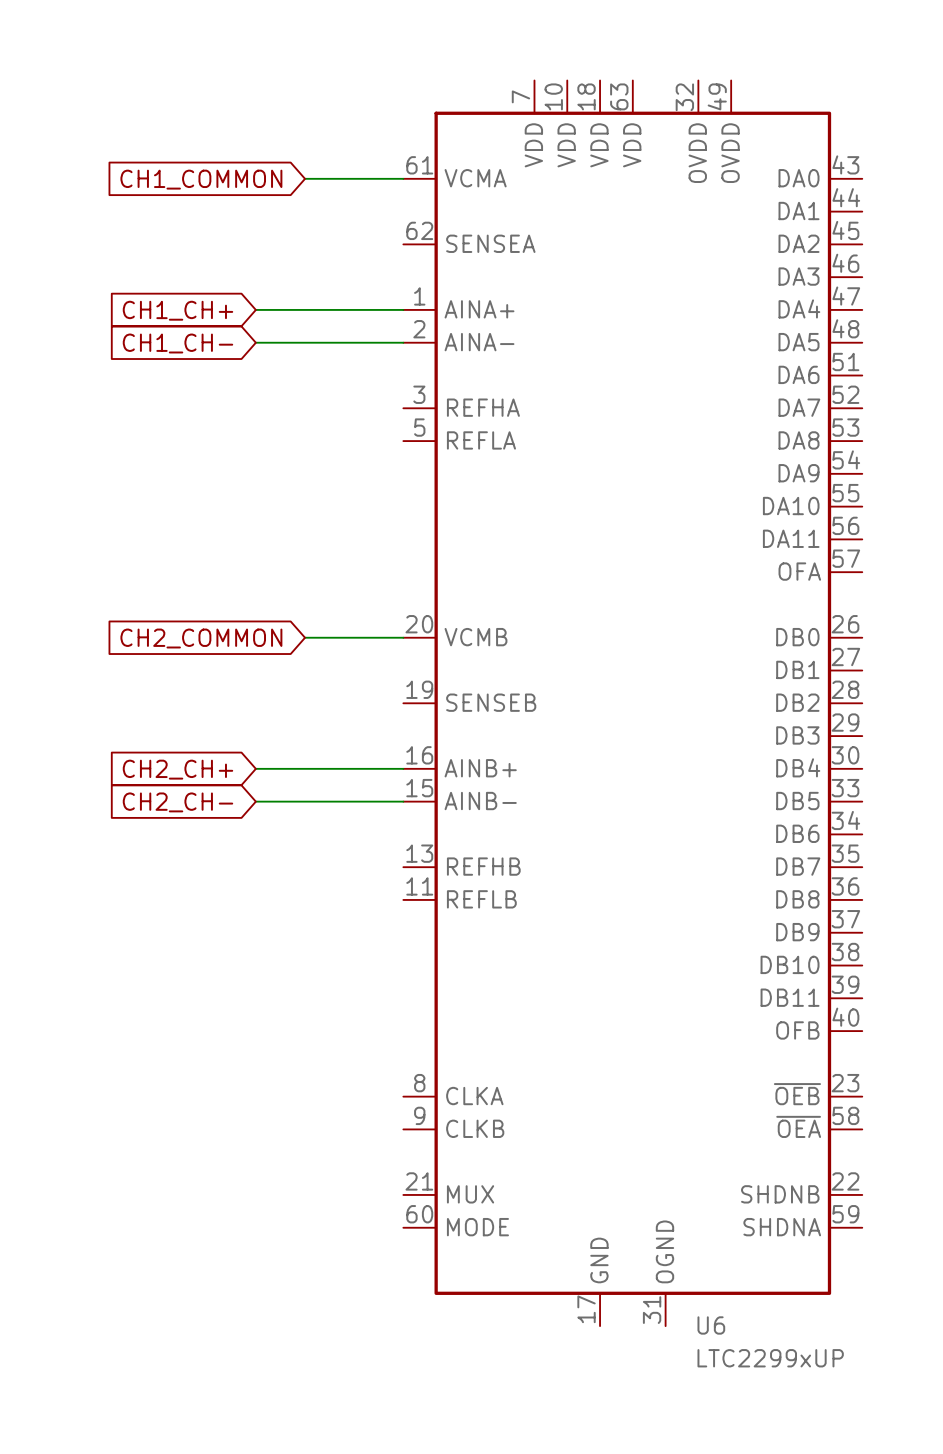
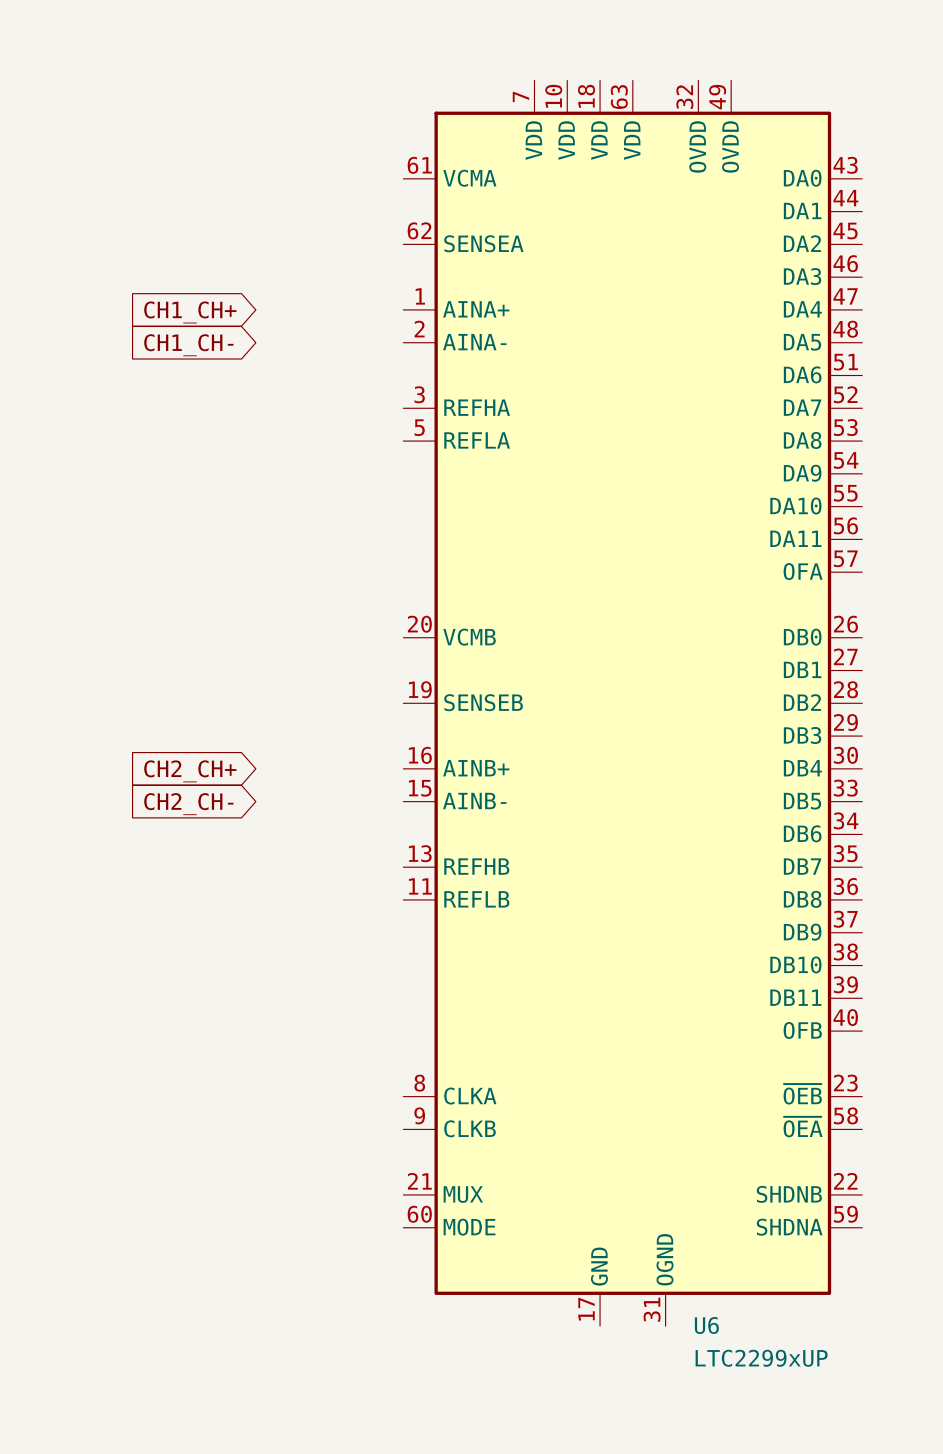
wire: (305, 178) (403, 178) -> none
global label: CH1_COMMON (201, 179) -> none
wire: (255, 309) (403, 309) -> none
wire: (255, 342) (403, 342) -> none
wire: (305, 637) (403, 637) -> none
global label: CH2_COMMON (201, 638) -> none
wire: (255, 768) (403, 768) -> none
wire: (255, 801) (403, 801) -> none

